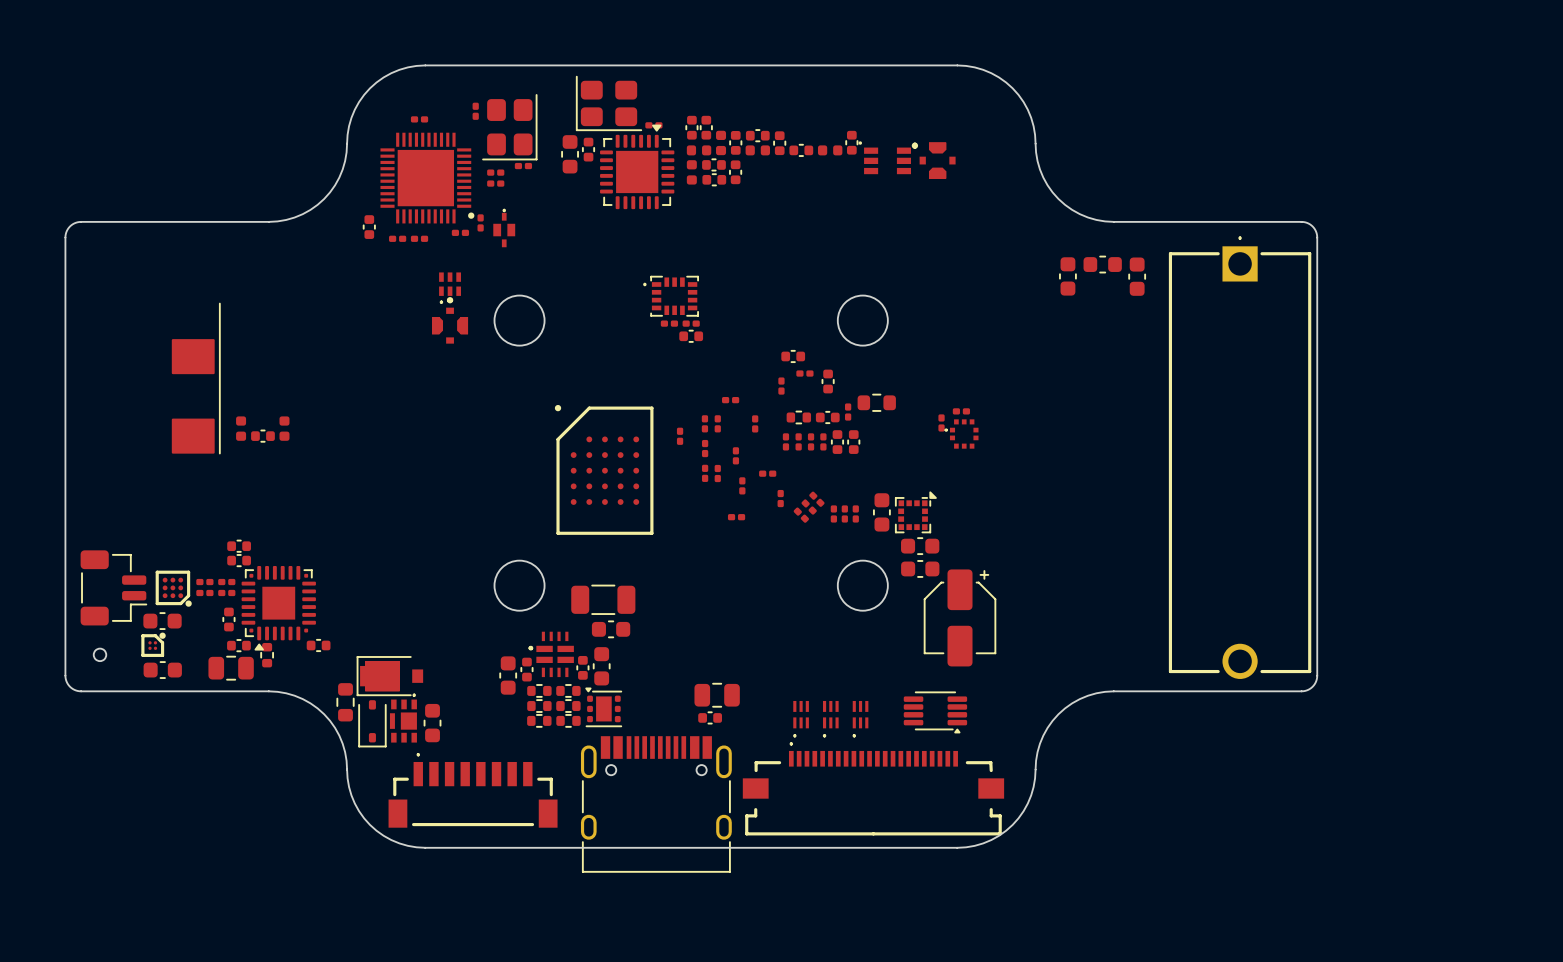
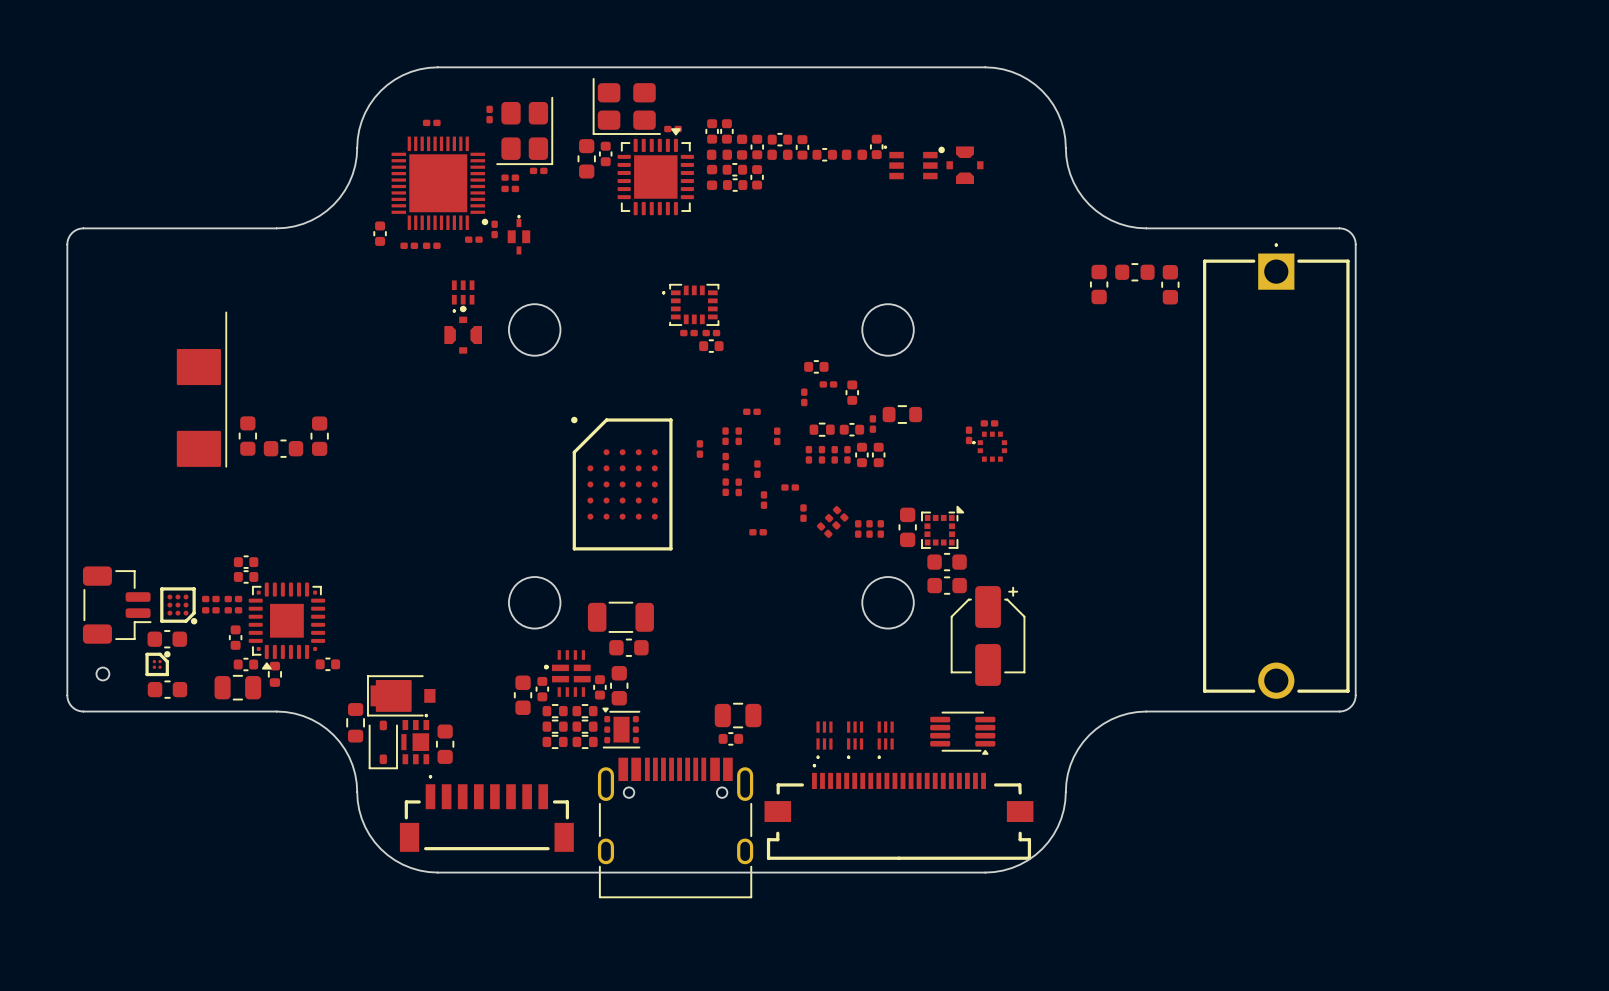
part footprint: [236, 416, 247, 441] -> [238, 416, 258, 456]
part: none -> (319, 436)
part: (284, 428) -> none
part: none -> (283, 448)
part: (262, 436) -> none

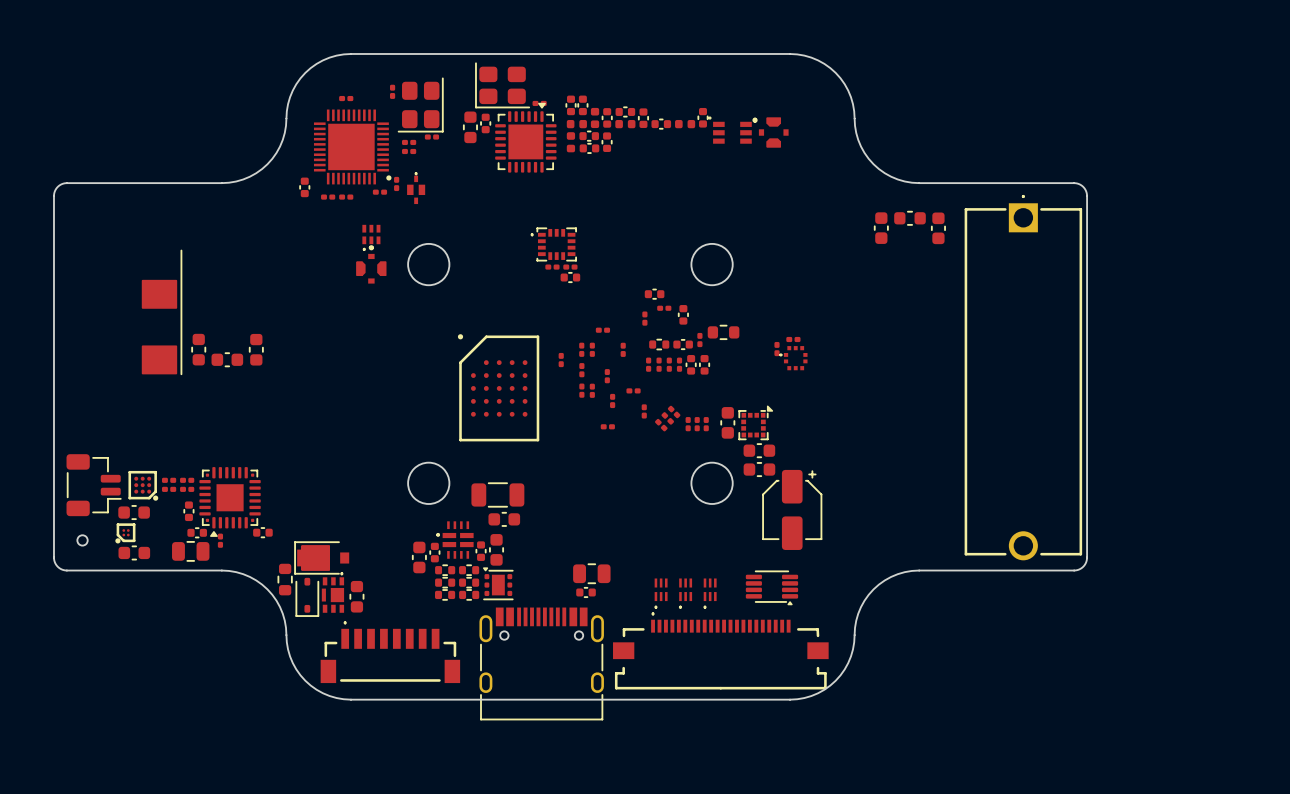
part: (246, 562) -> none
part: (246, 576) -> none
part footprint: [248, 582, 326, 670] -> [199, 467, 261, 537]
part footprint: [267, 661, 283, 687] -> [217, 533, 224, 548]
part rotation: 0° (158, 663) -> 180° (125, 533)

